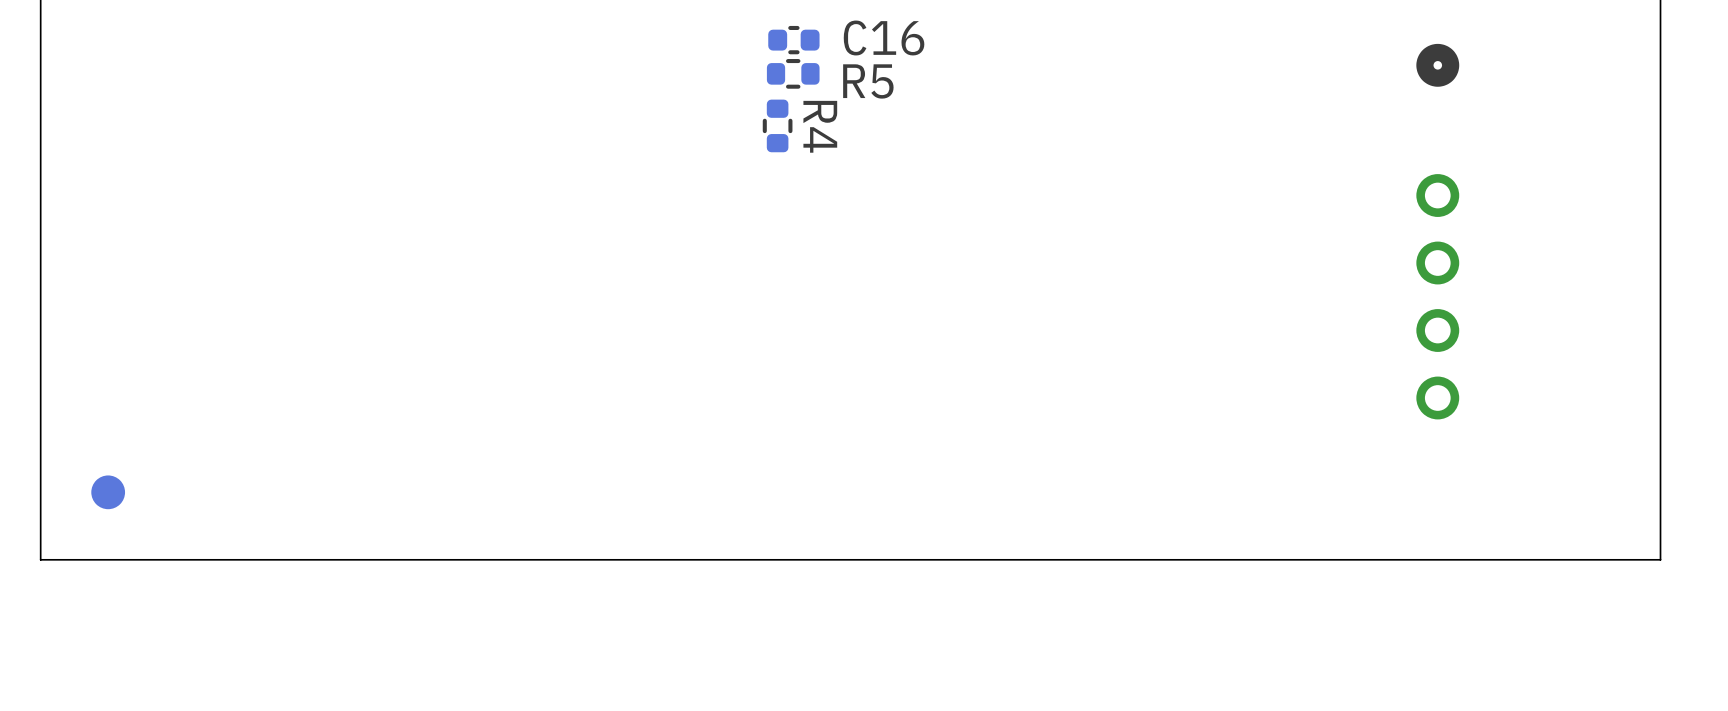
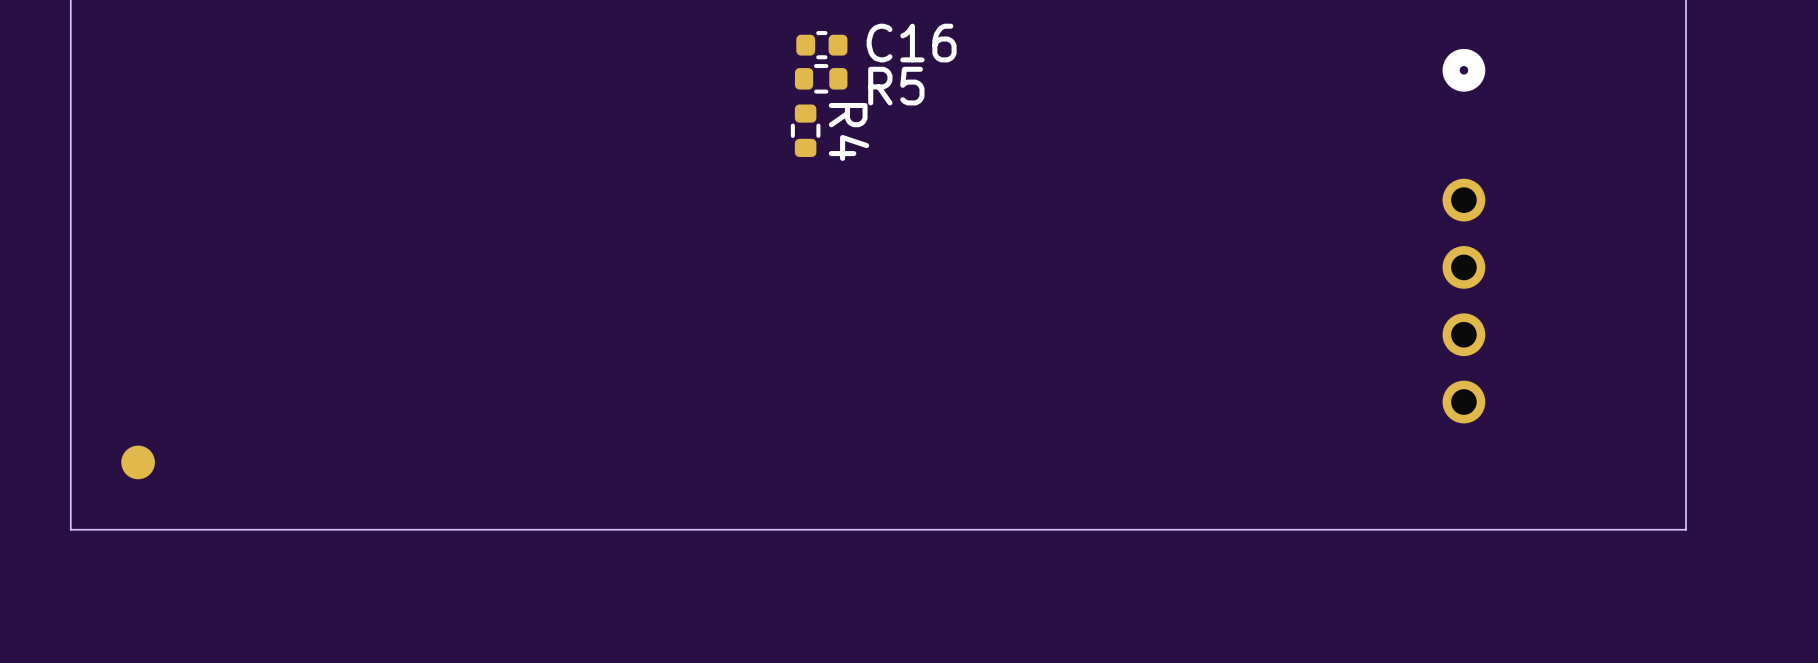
part position: (108, 492) -> (138, 462)
board edge: (1660, 526) (1660, 559) (40, 559) (40, 526) -> (1686, 529) (70, 529)

